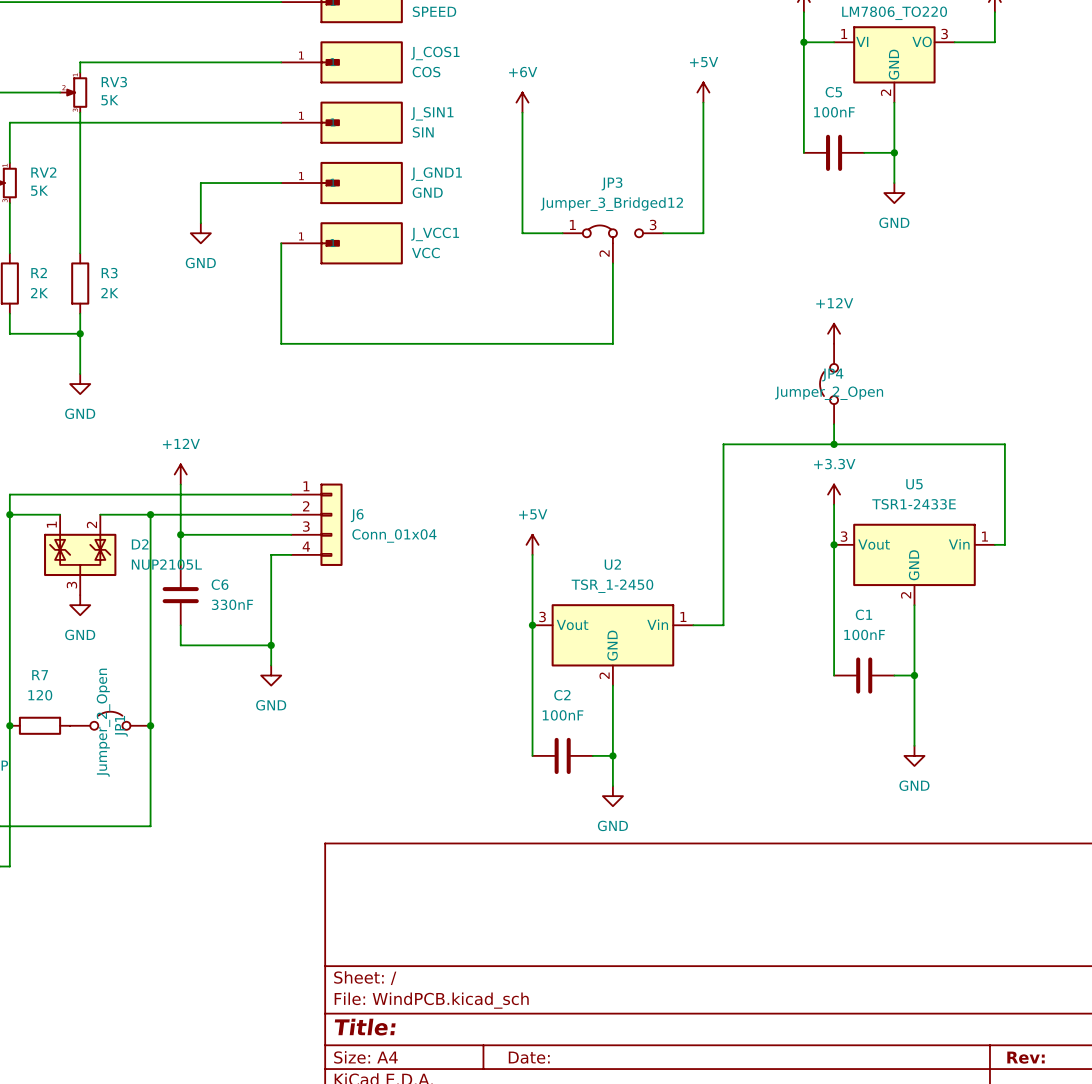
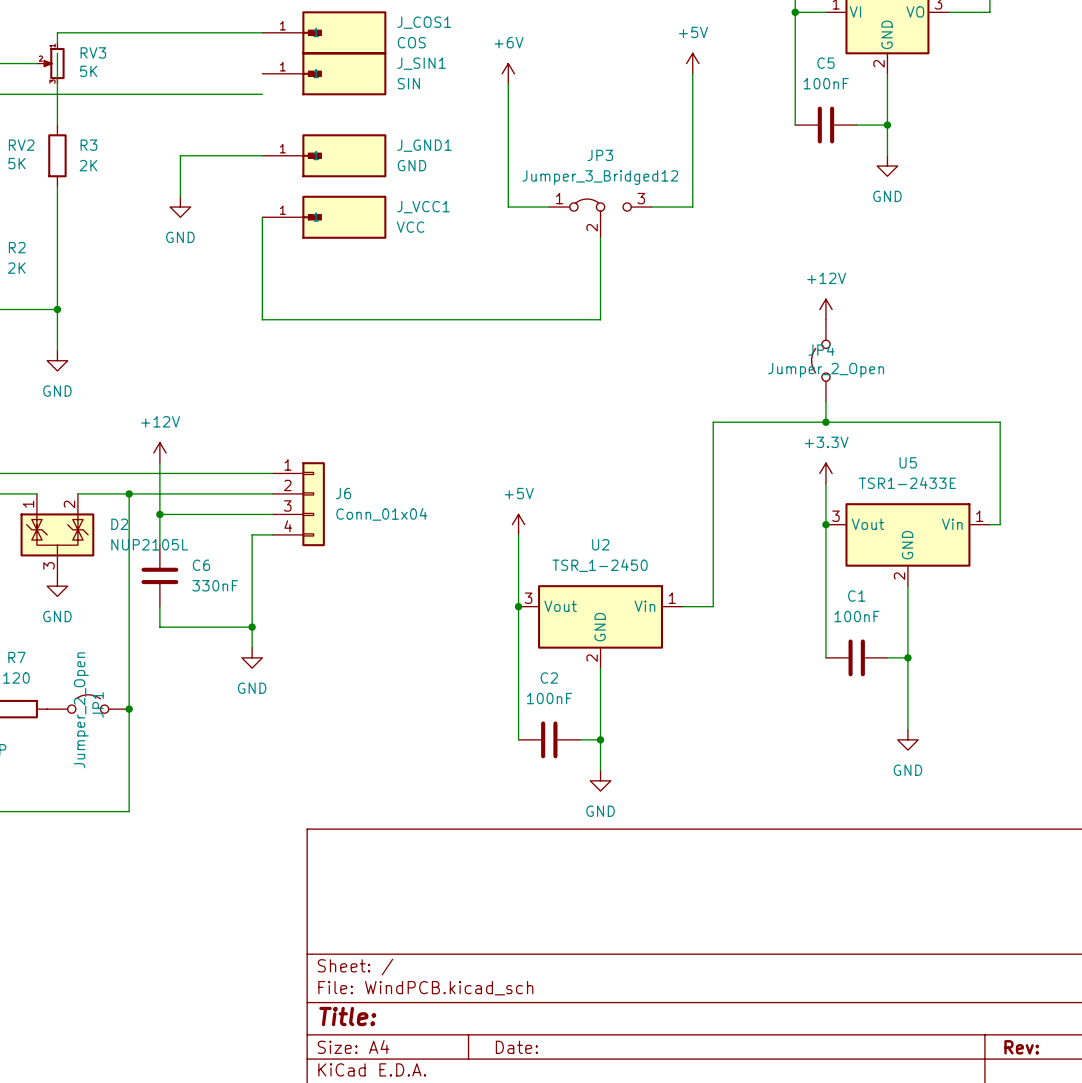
wire: none -> (57, 53) (57, 84)
J_SIN1 position: (342, 122) -> (324, 73)
wire: (80, 152) (80, 213) -> (57, 227) (57, 288)
R3 position: (80, 283) -> (57, 155)

